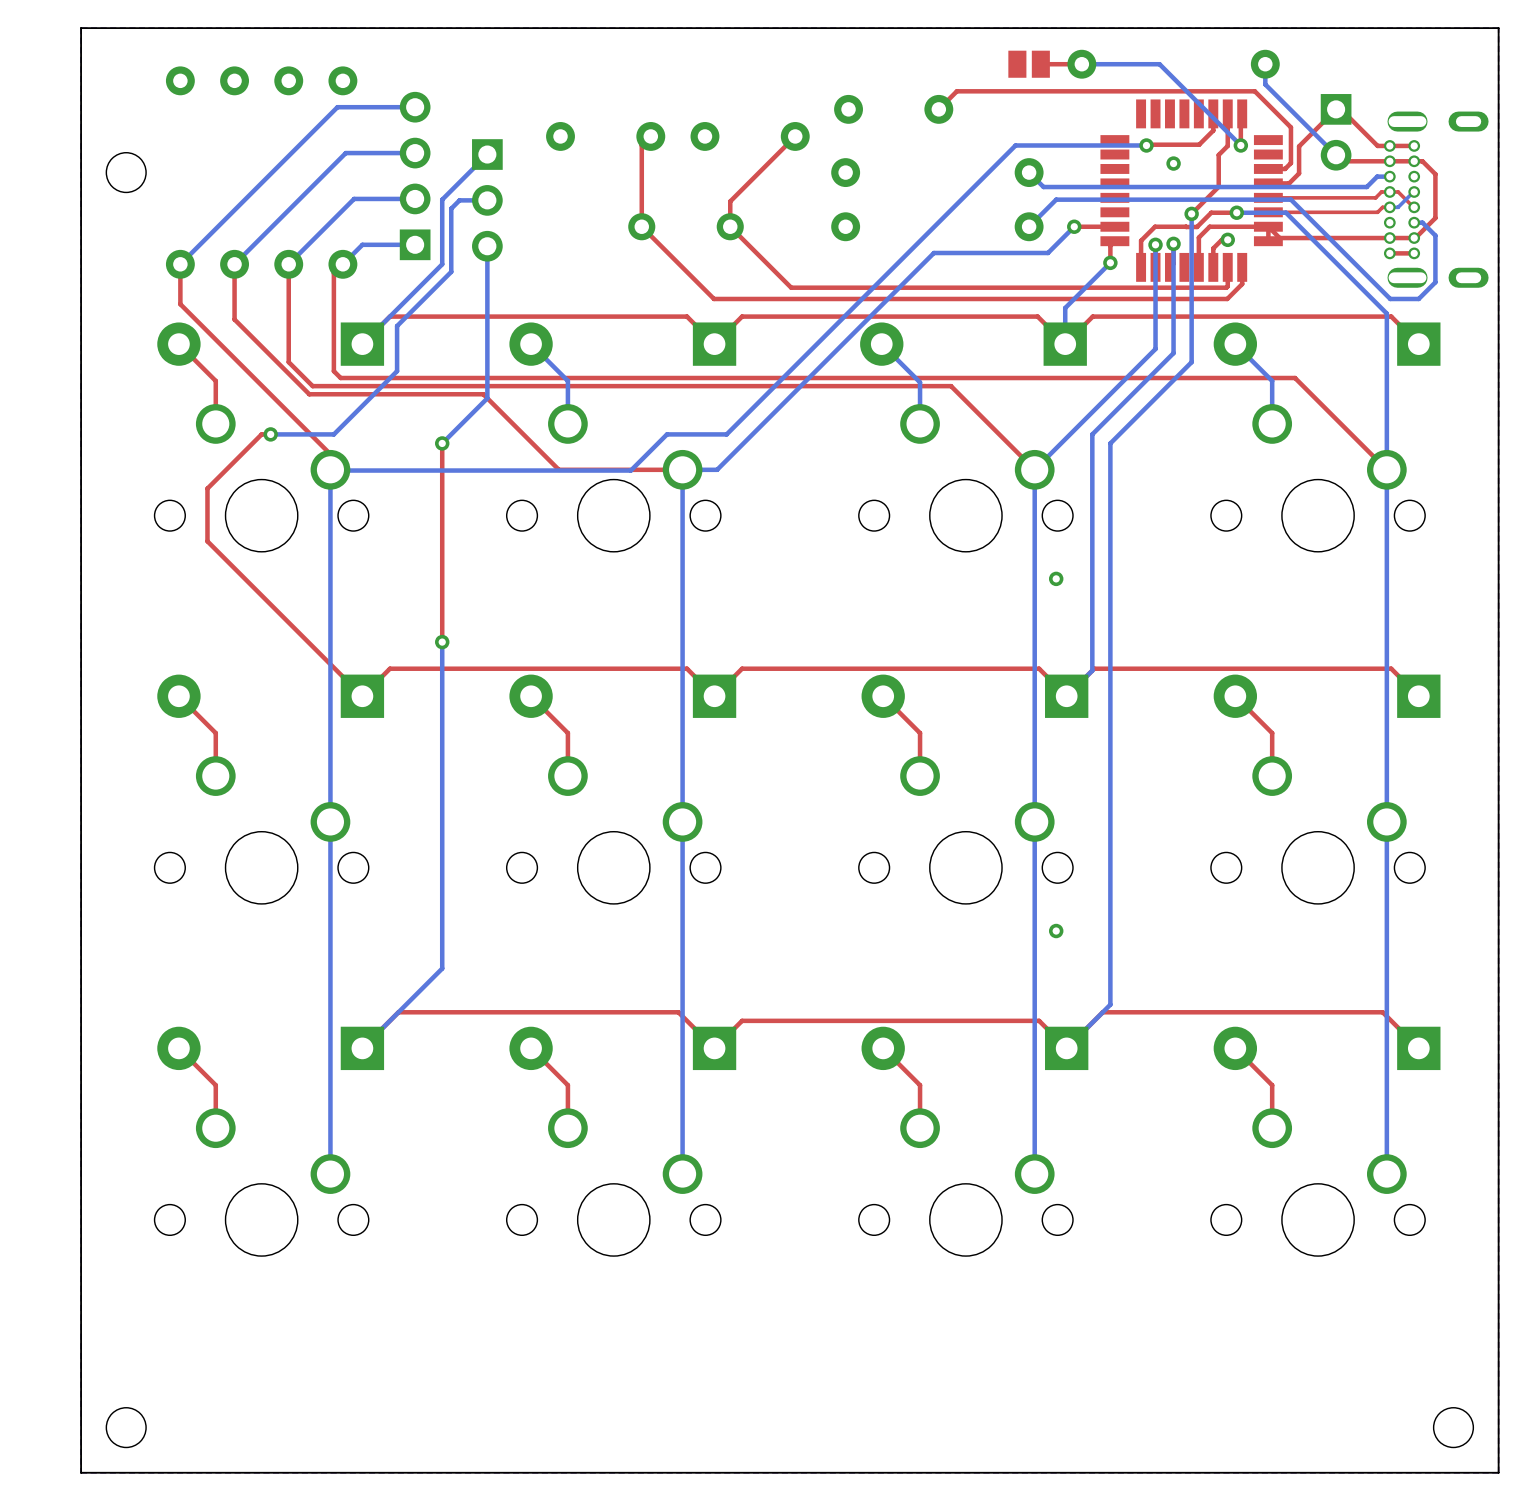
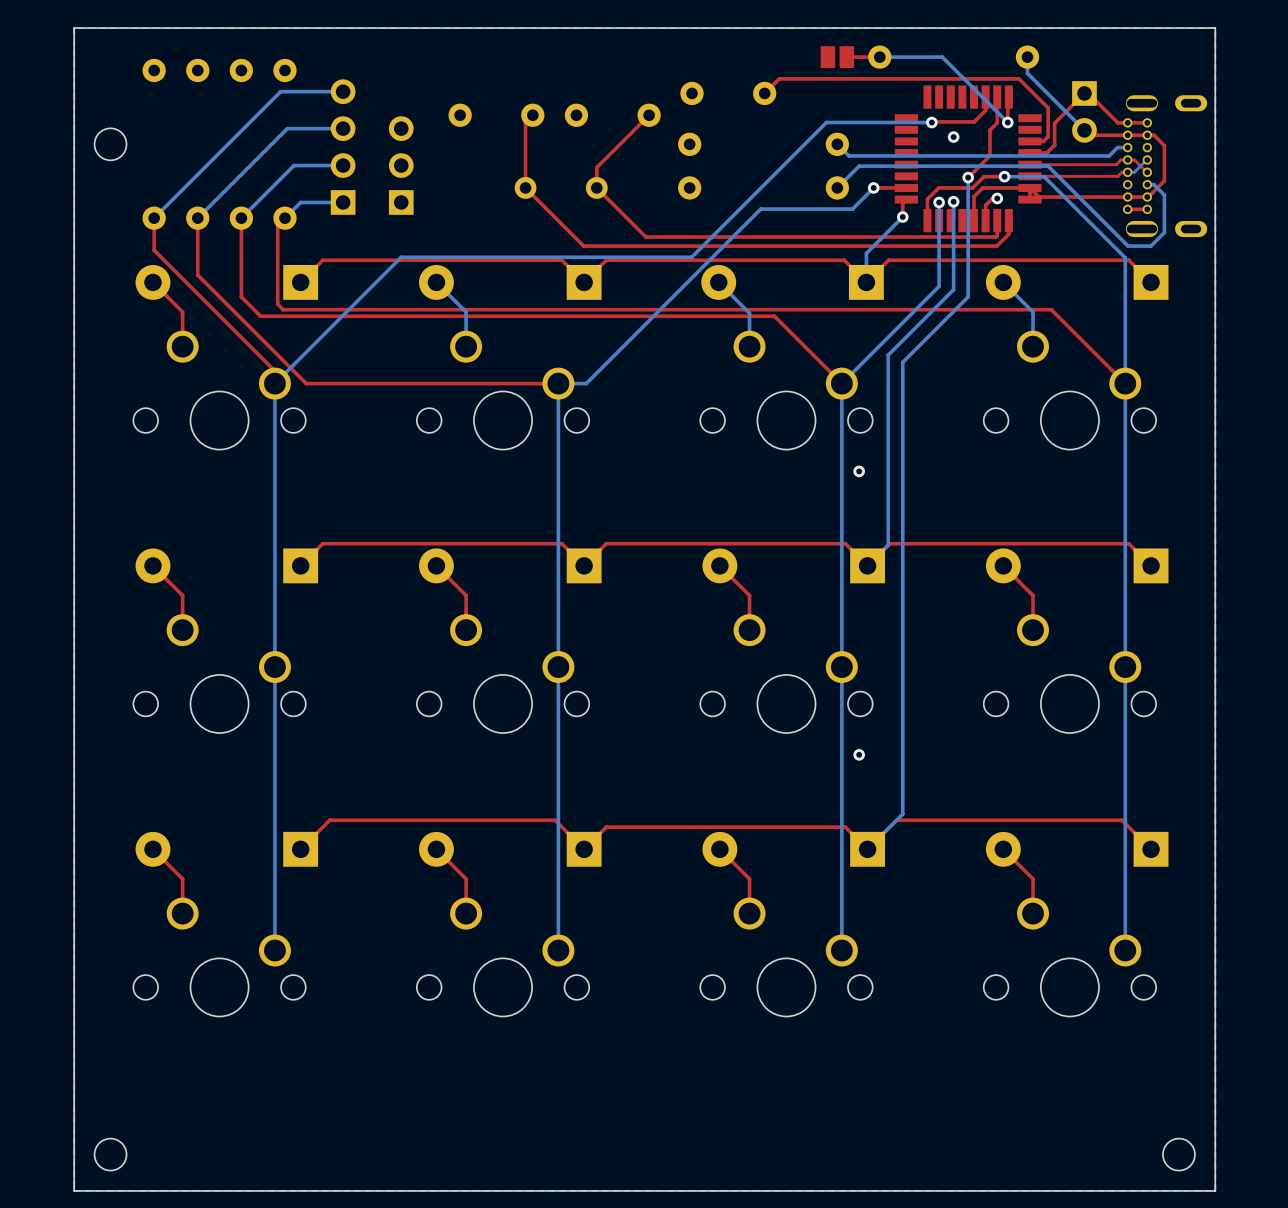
bottom track: (487, 154) (442, 199) (442, 264) (362, 344) -> none
bottom track: (487, 200) (459, 200) (451, 208) (451, 271) (397, 326) (397, 371) (333, 434) (270, 434) -> none
part rotation: 0° (487, 200) -> 180° (401, 165)
bottom track: (487, 246) (487, 398) (442, 443) -> none
bottom track: (848, 312) (726, 434) (667, 434) (630, 470) (330, 469) -> (691, 257) (401, 257) (274, 383)
top track: (234, 319) (309, 394) (483, 394) (558, 469) -> (197, 262) (197, 275) (306, 383) (458, 383)
top track: (270, 434) (261, 434) (207, 488) (207, 541) (362, 696) -> none
via: (270, 434) -> none
top track: (442, 443) (442, 642) -> none
via: (442, 443) -> none
bottom track: (442, 642) (442, 968) (362, 1048) -> none
via: (442, 642) -> none

